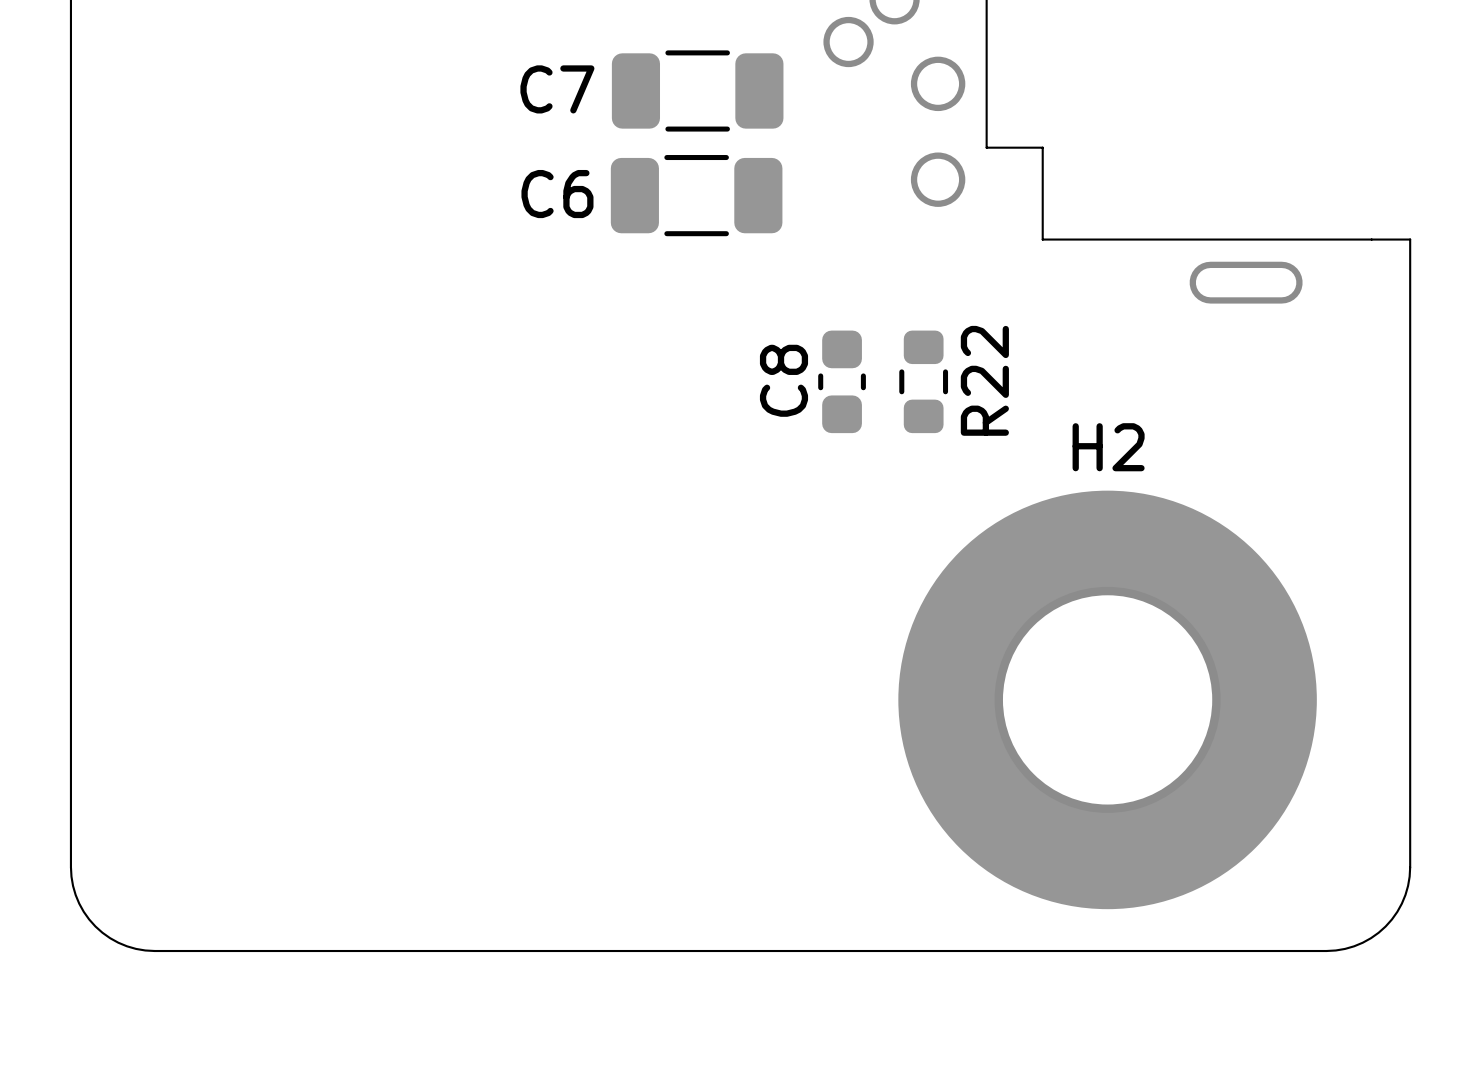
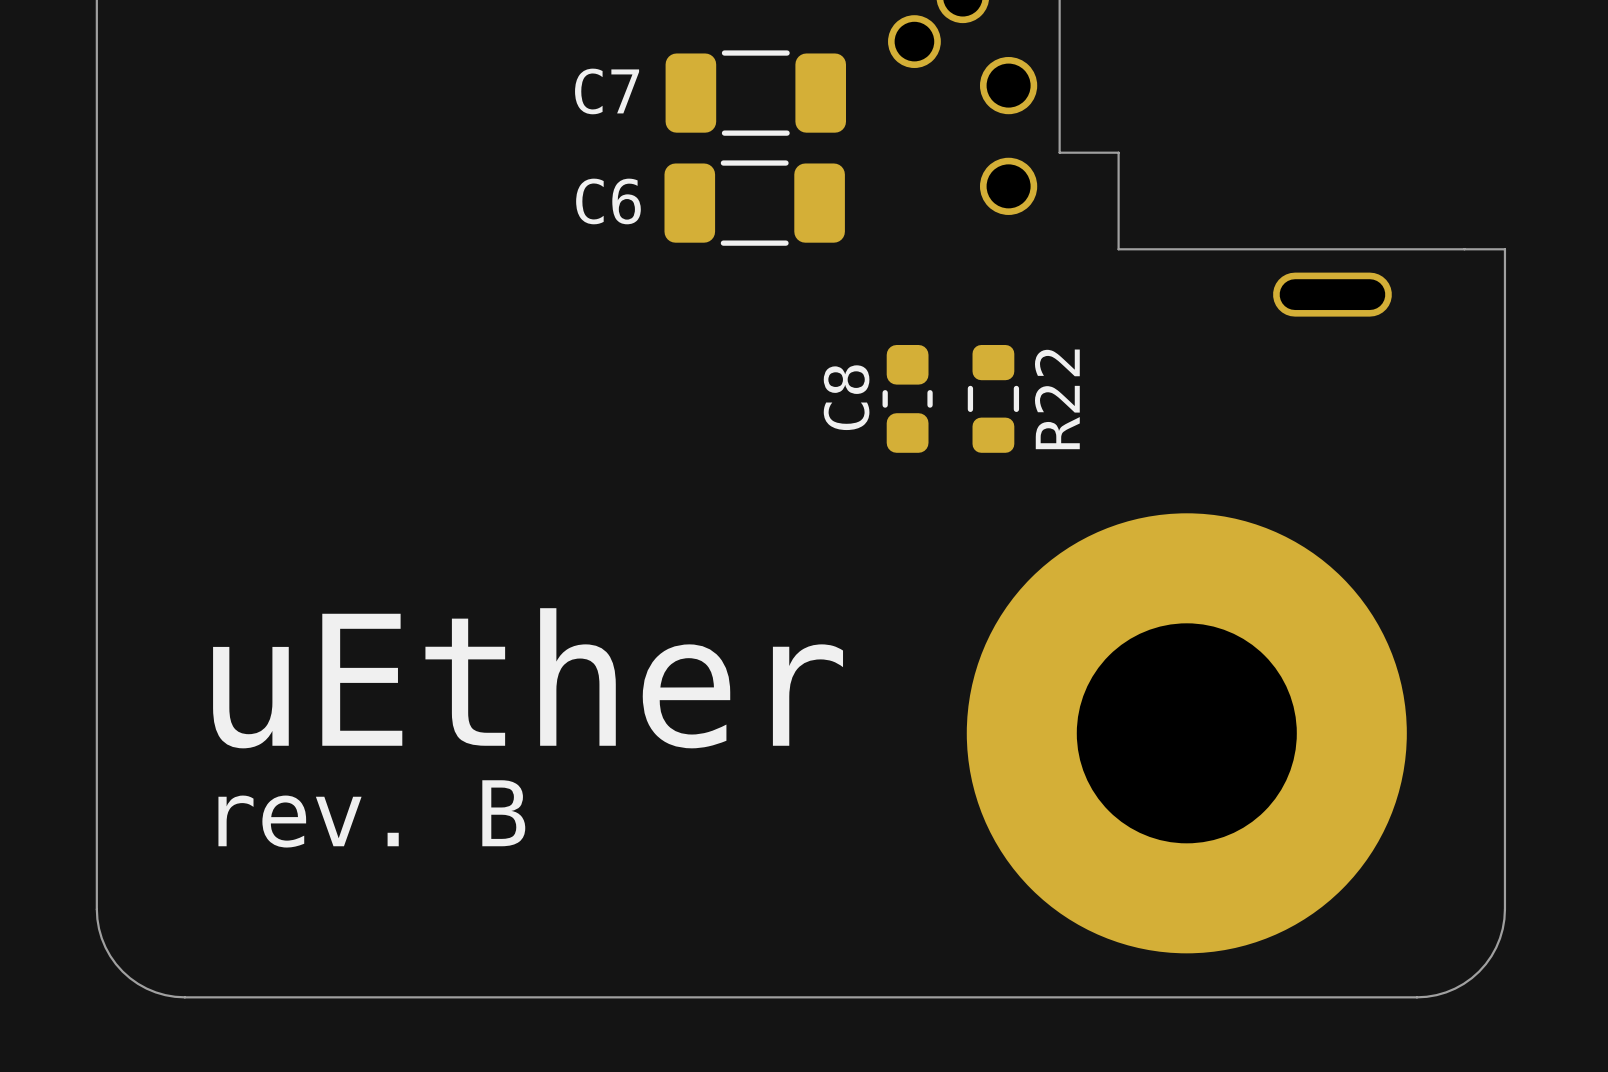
H2 name: H2 (1108, 447) -> none
text: none -> uEther (528, 678)
text: none -> rev. B (371, 813)

